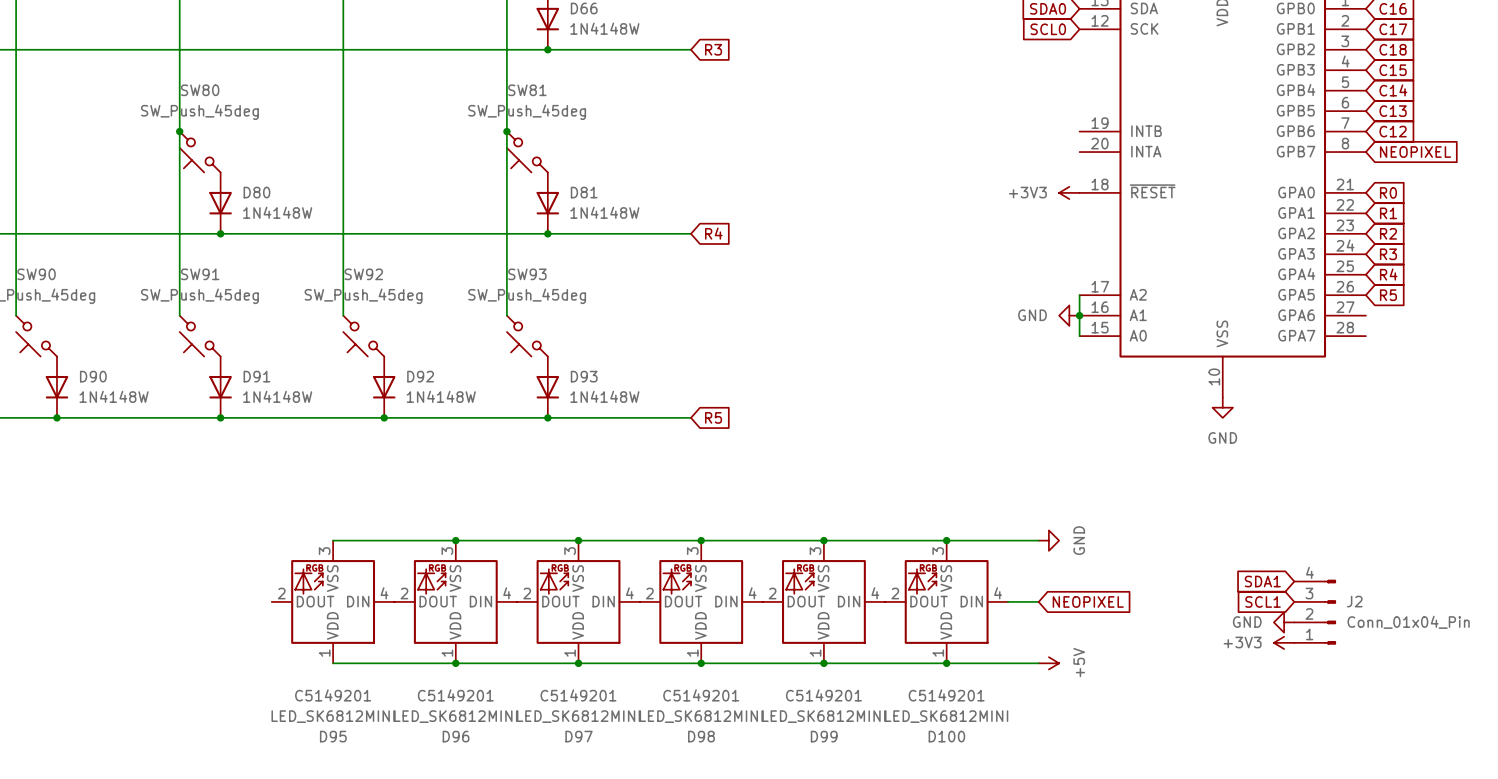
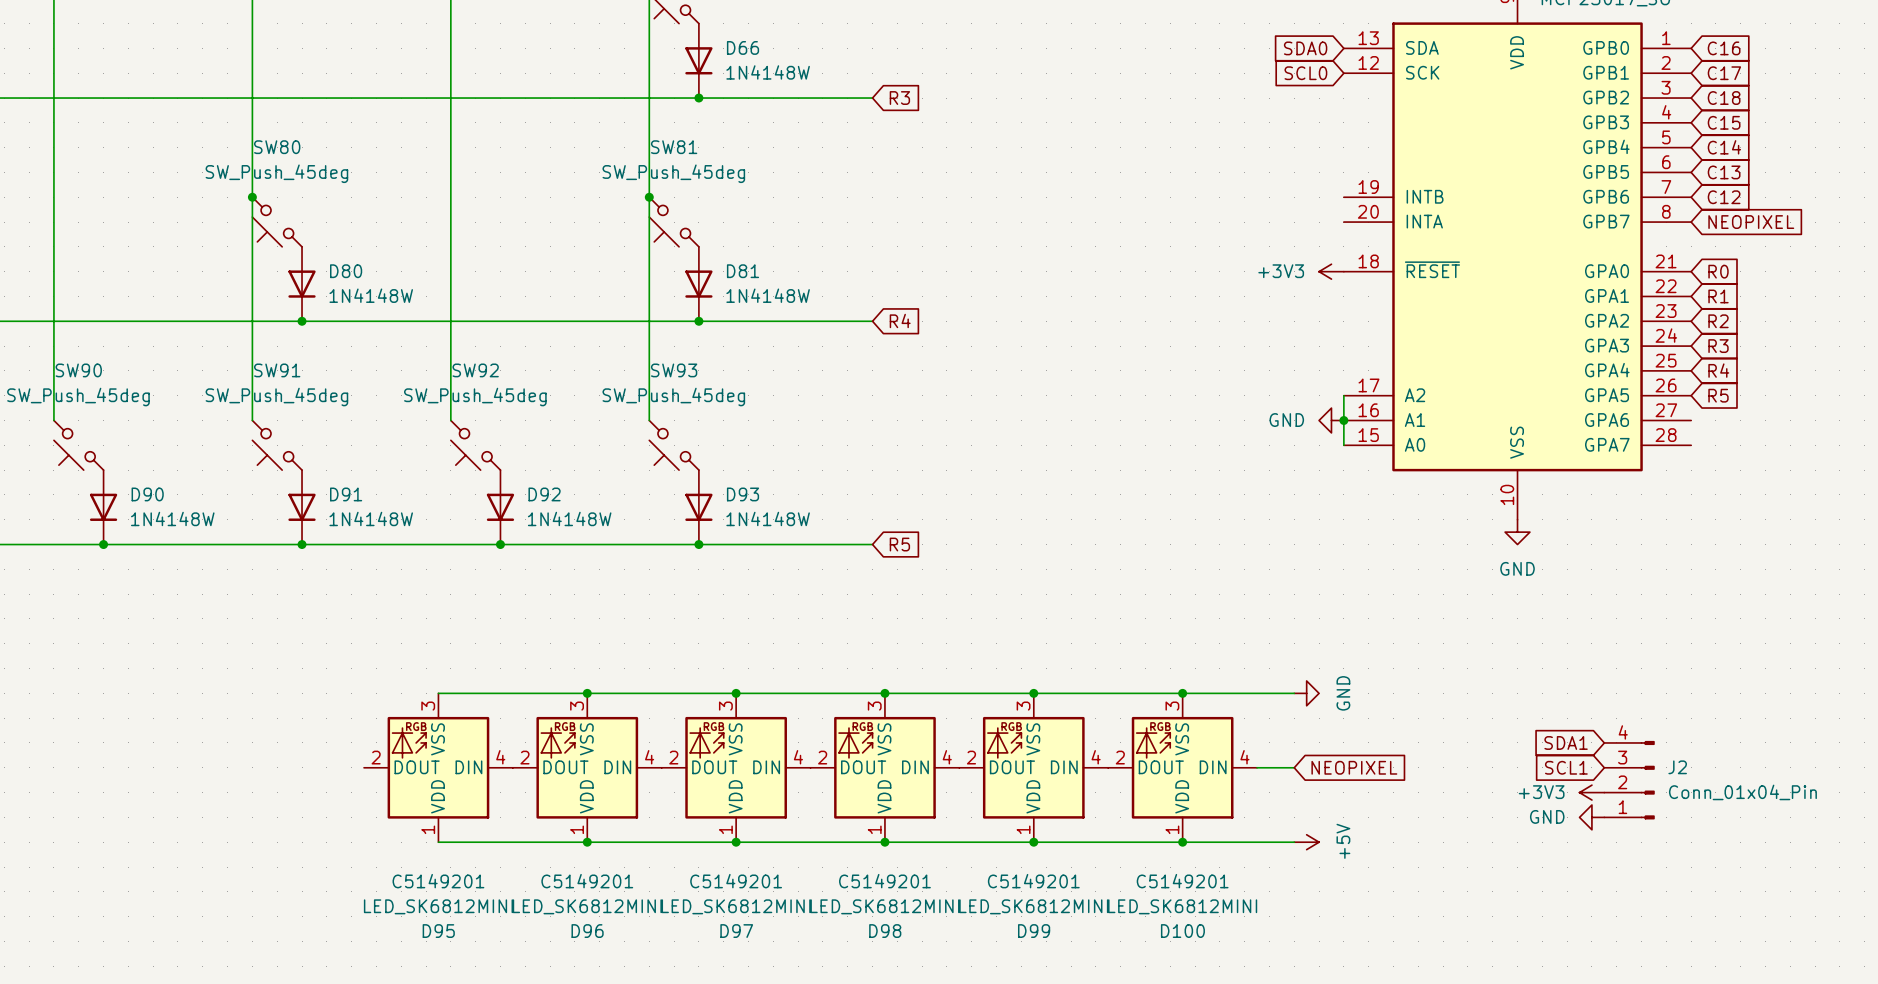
power symbol: GND (1284, 622) -> +3V3 (1591, 792)
power symbol: +3V3 (1284, 642) -> GND (1591, 817)

